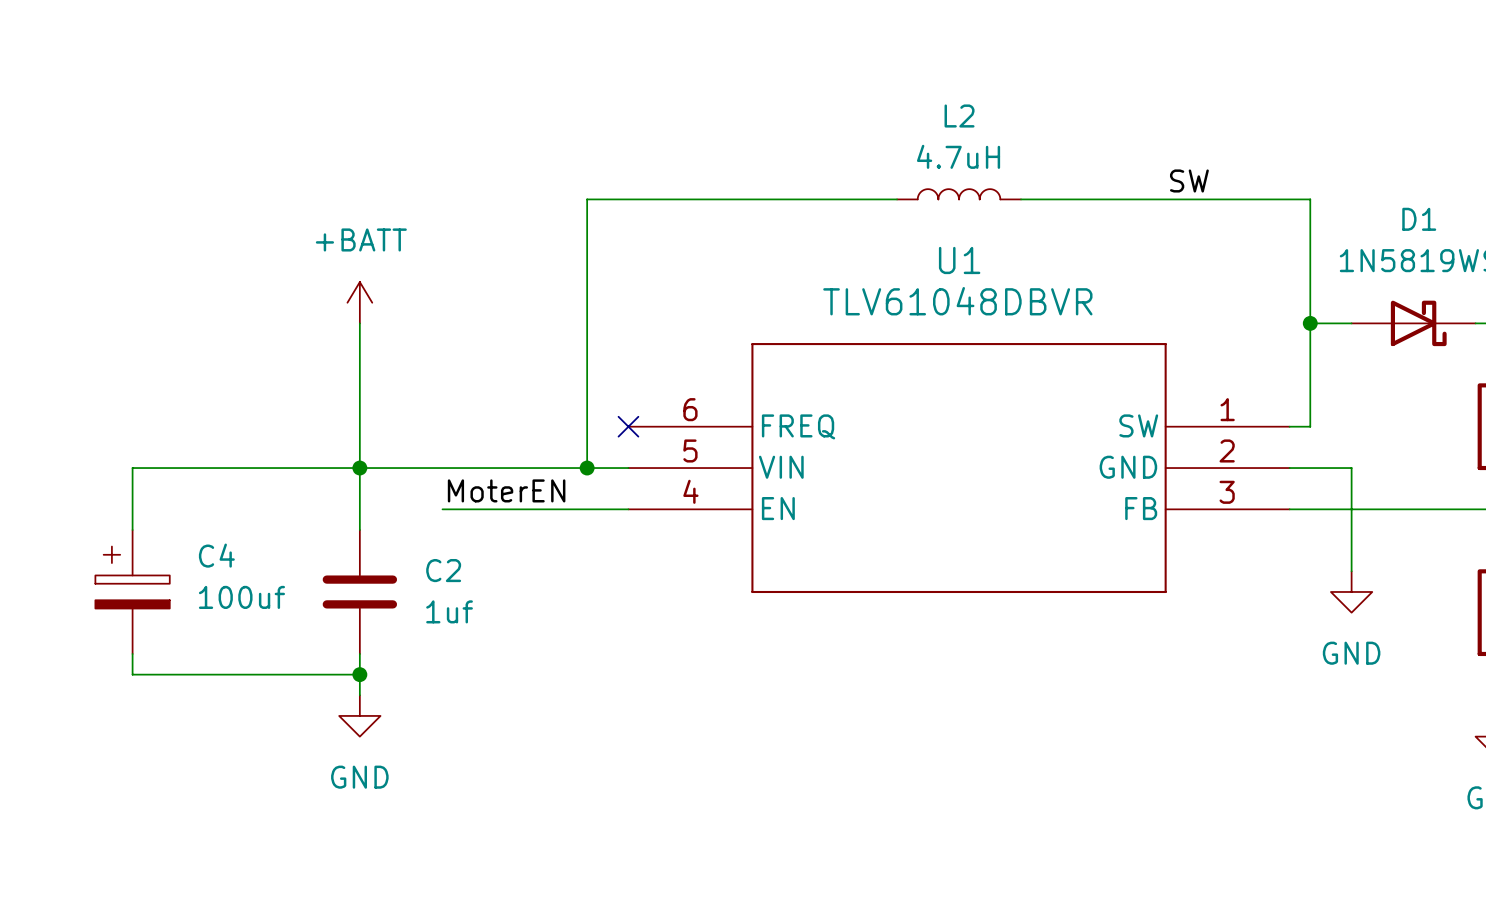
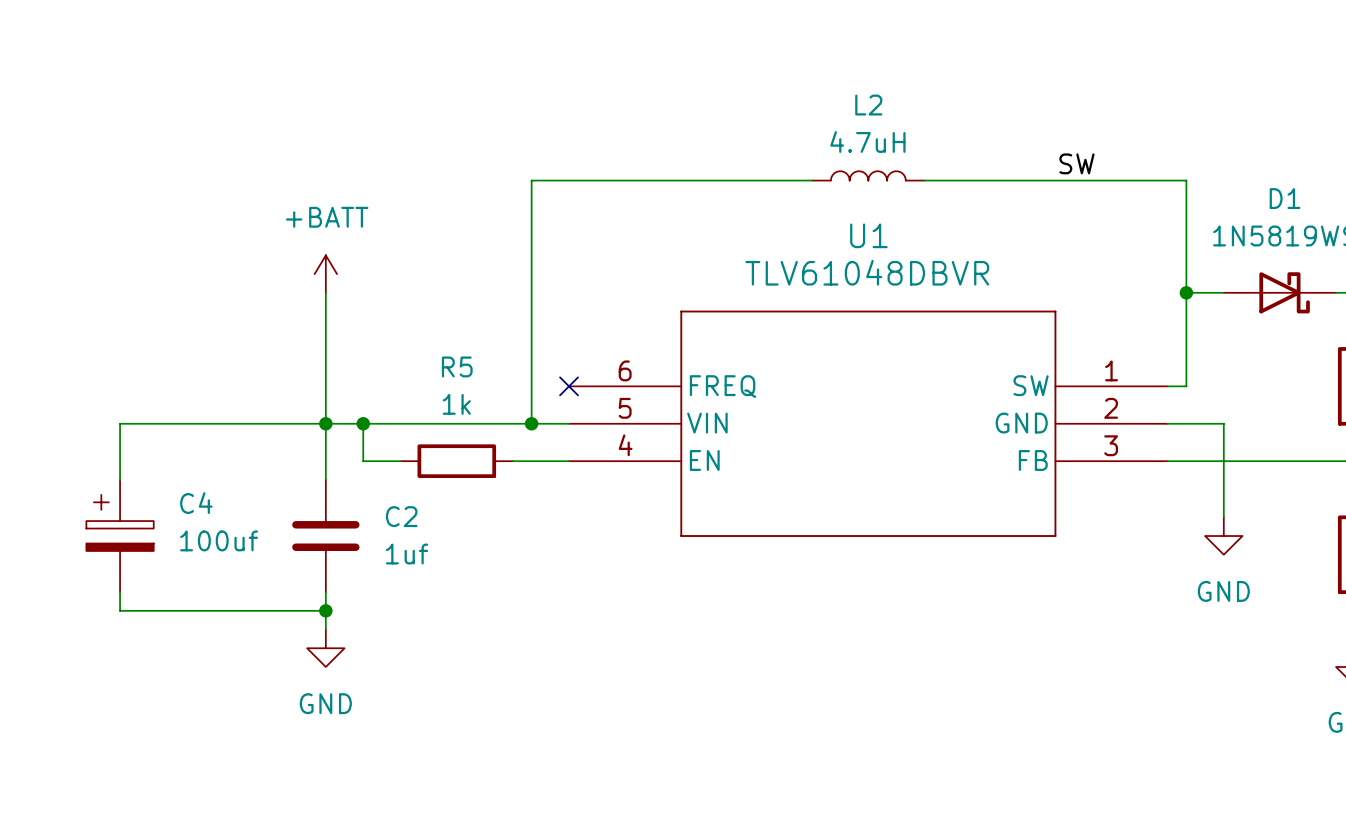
junction: none -> (363, 423)
label: MoterEN (506, 490) -> none
wire: (442, 509) (566, 509) -> (400, 461) (363, 461) (363, 423)
R5: none -> 1k (456, 461)

